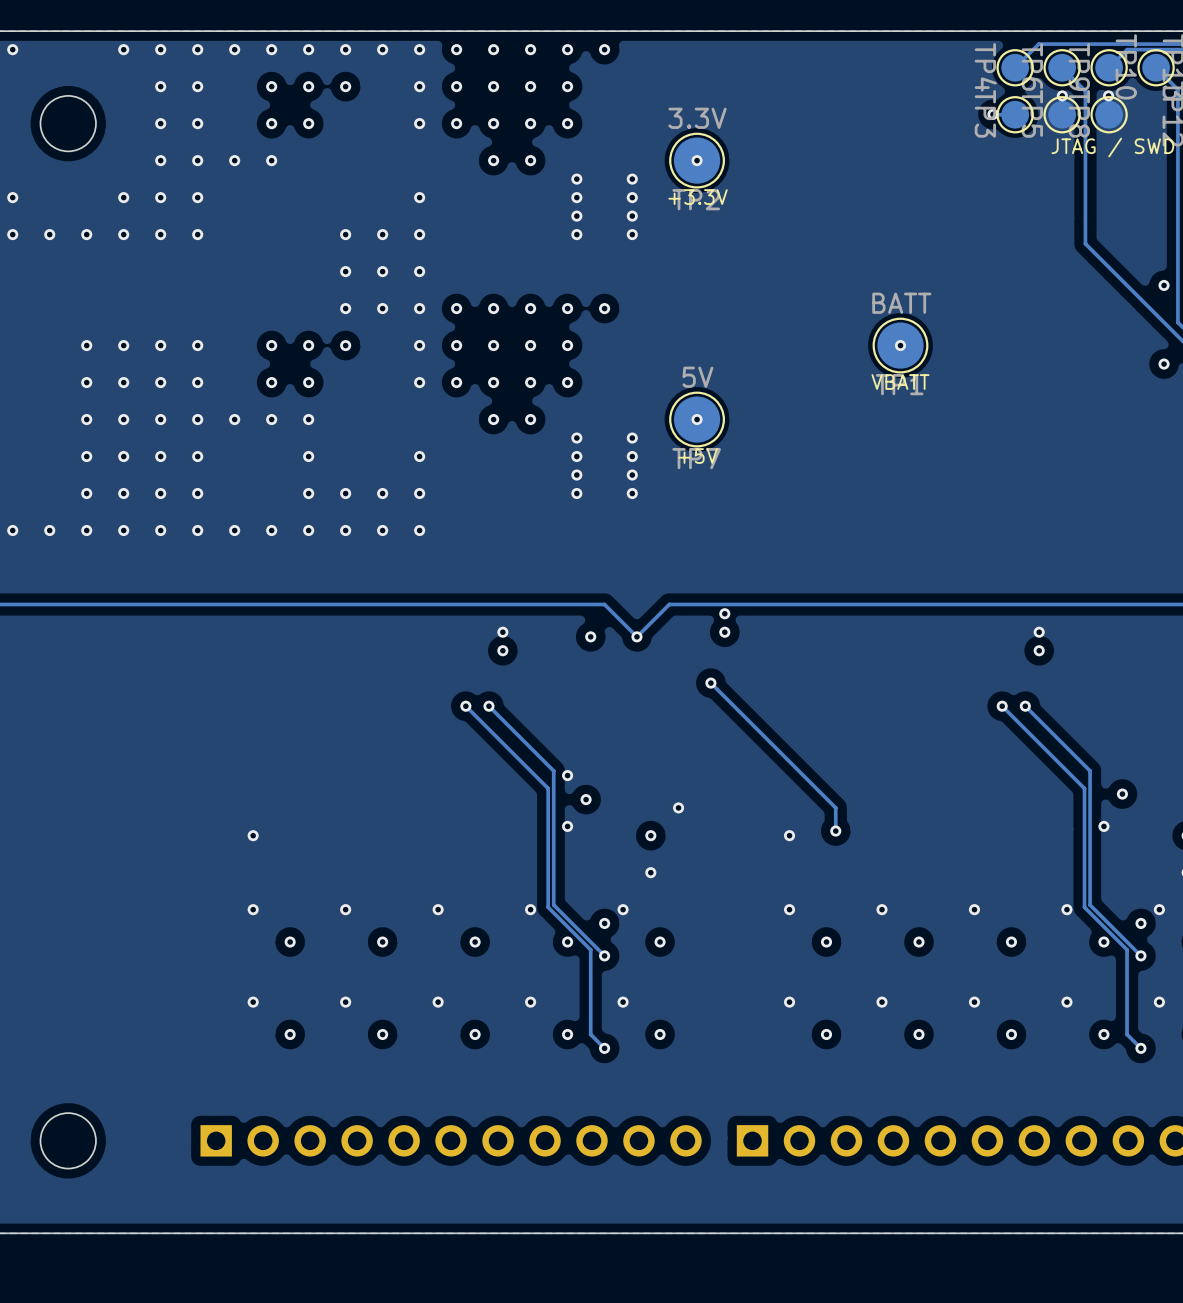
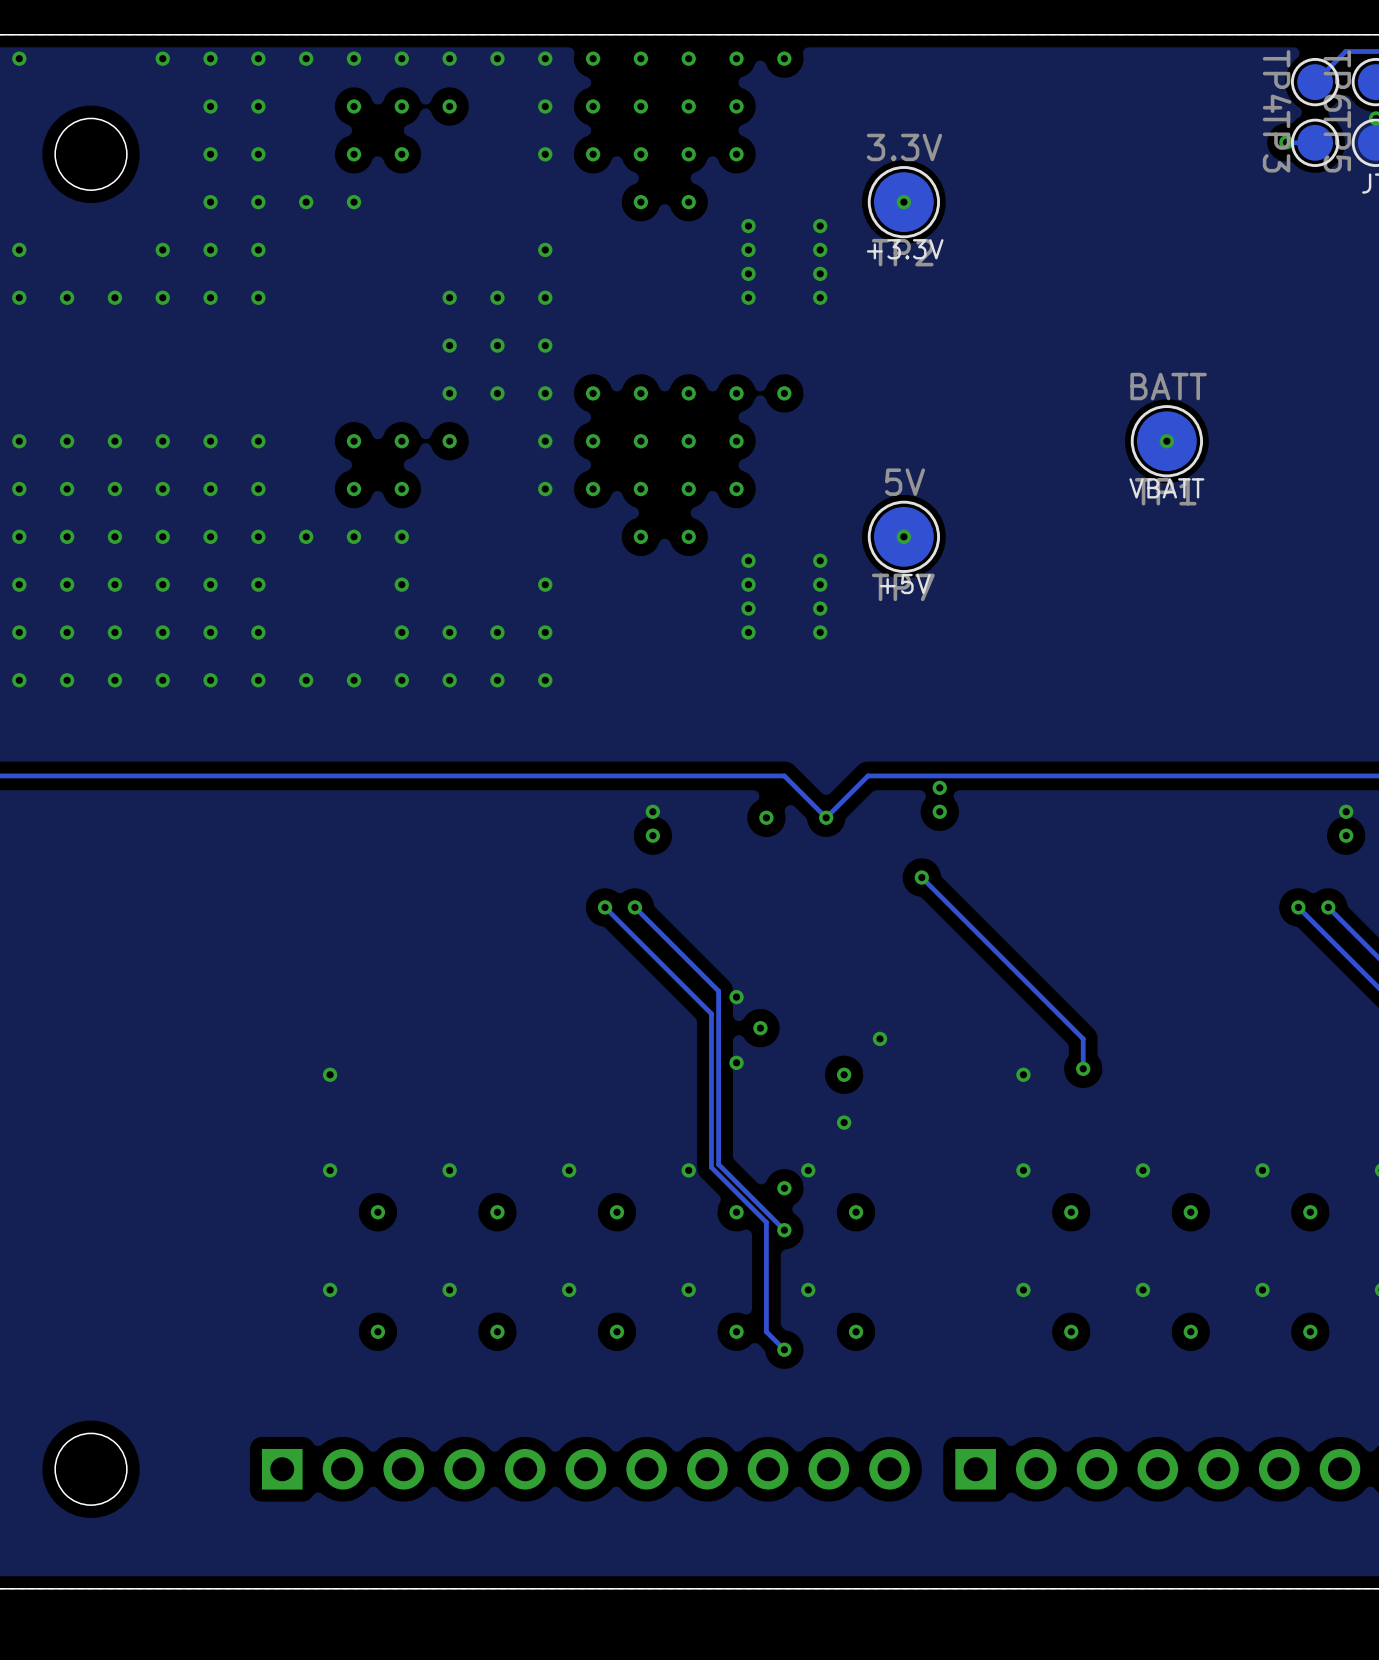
via: none -> (19, 441)
via: none -> (67, 441)
via: none -> (19, 489)
via: none -> (67, 489)
via: none -> (19, 536)
via: none -> (67, 536)
via: none -> (19, 584)
via: none -> (67, 584)
via: none -> (19, 632)
via: none -> (67, 632)

